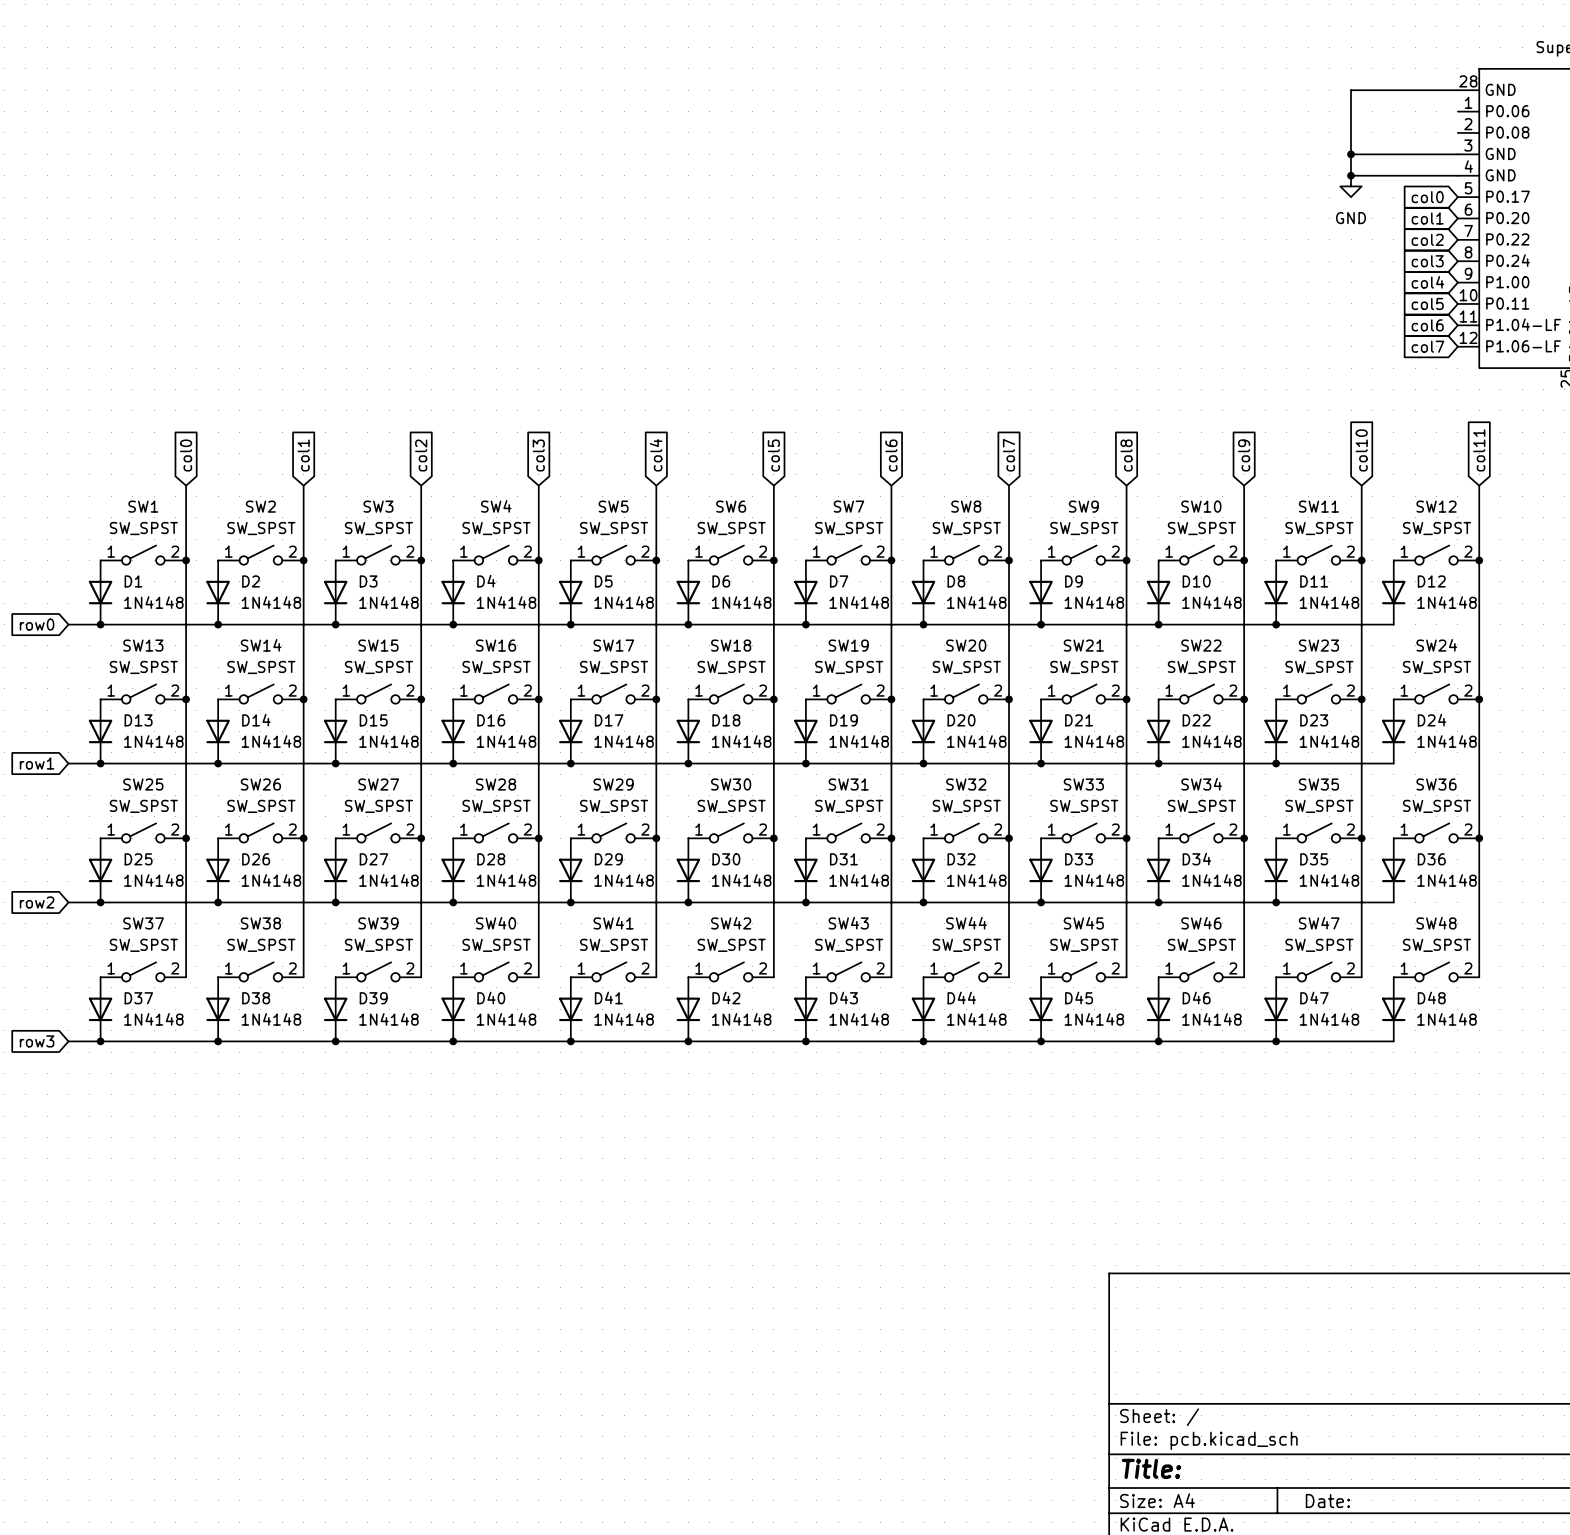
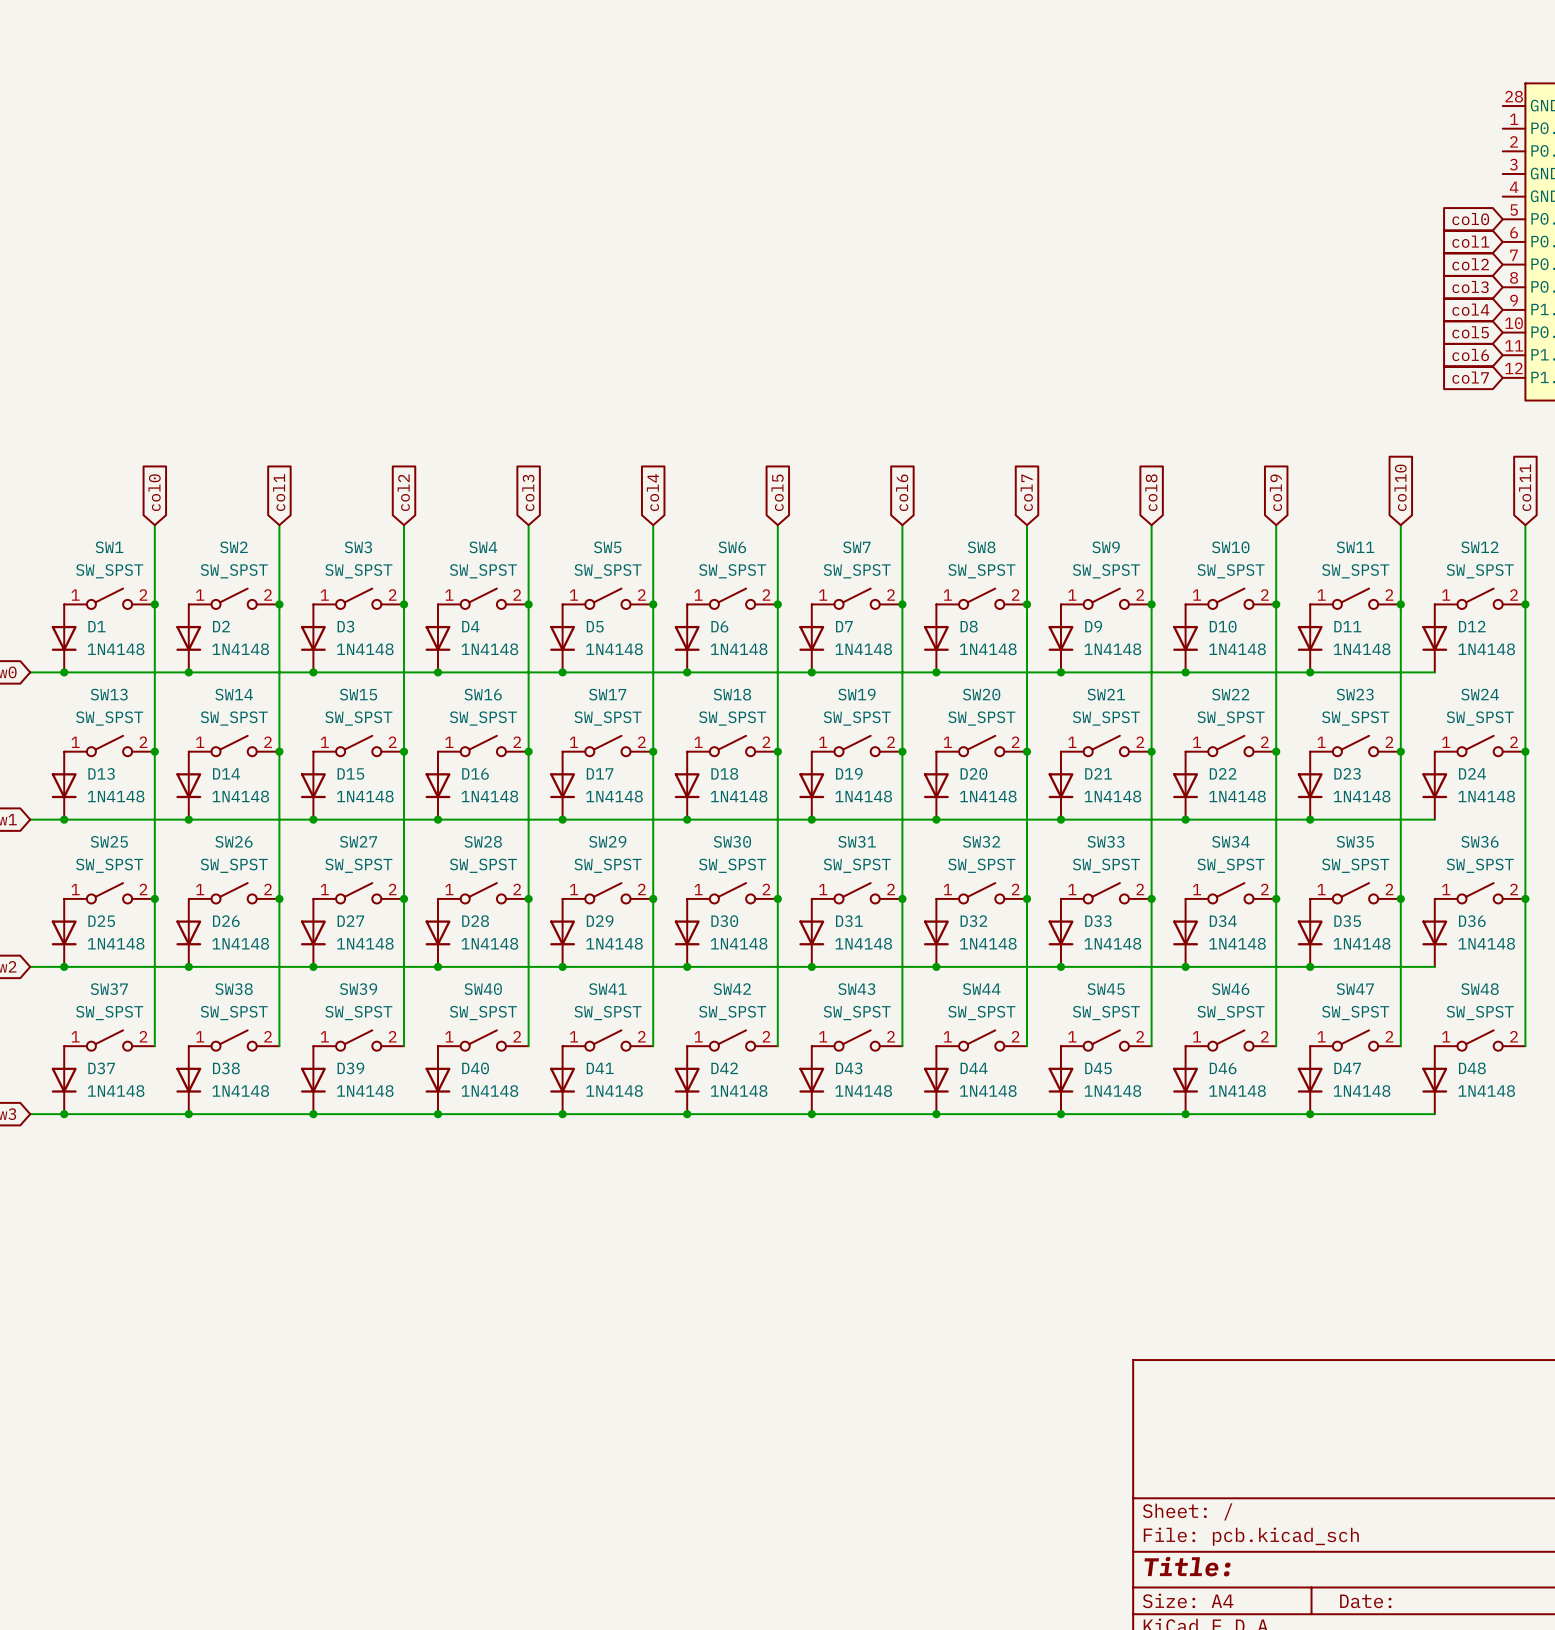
wire: (1457, 90) (1351, 90) (1351, 175) (1457, 175) -> none
wire: (1351, 154) (1457, 154) -> none
junction: (1351, 154) -> none
junction: (1351, 175) -> none
power symbol: GND (1351, 186) -> none

